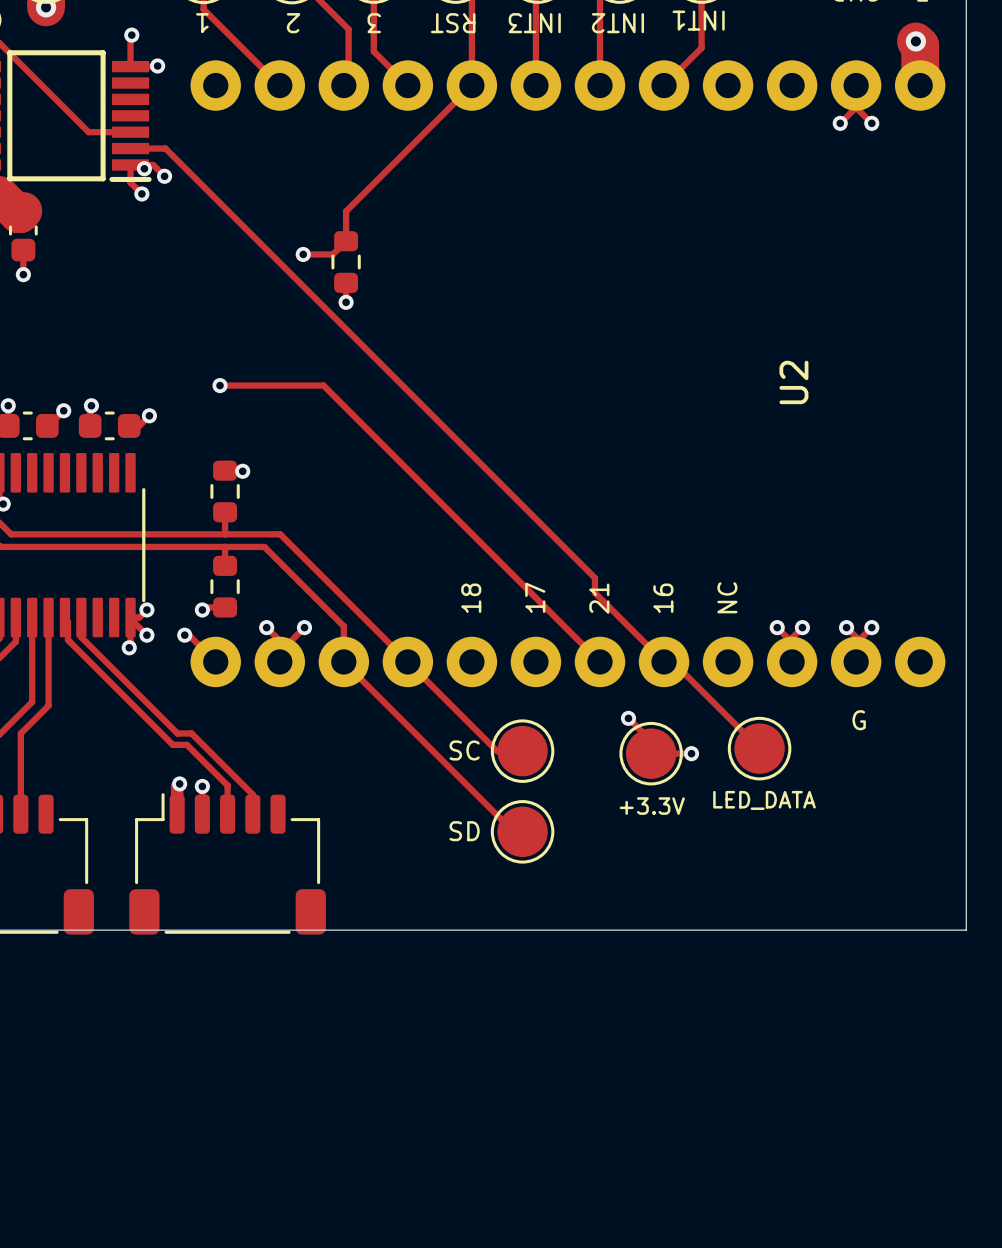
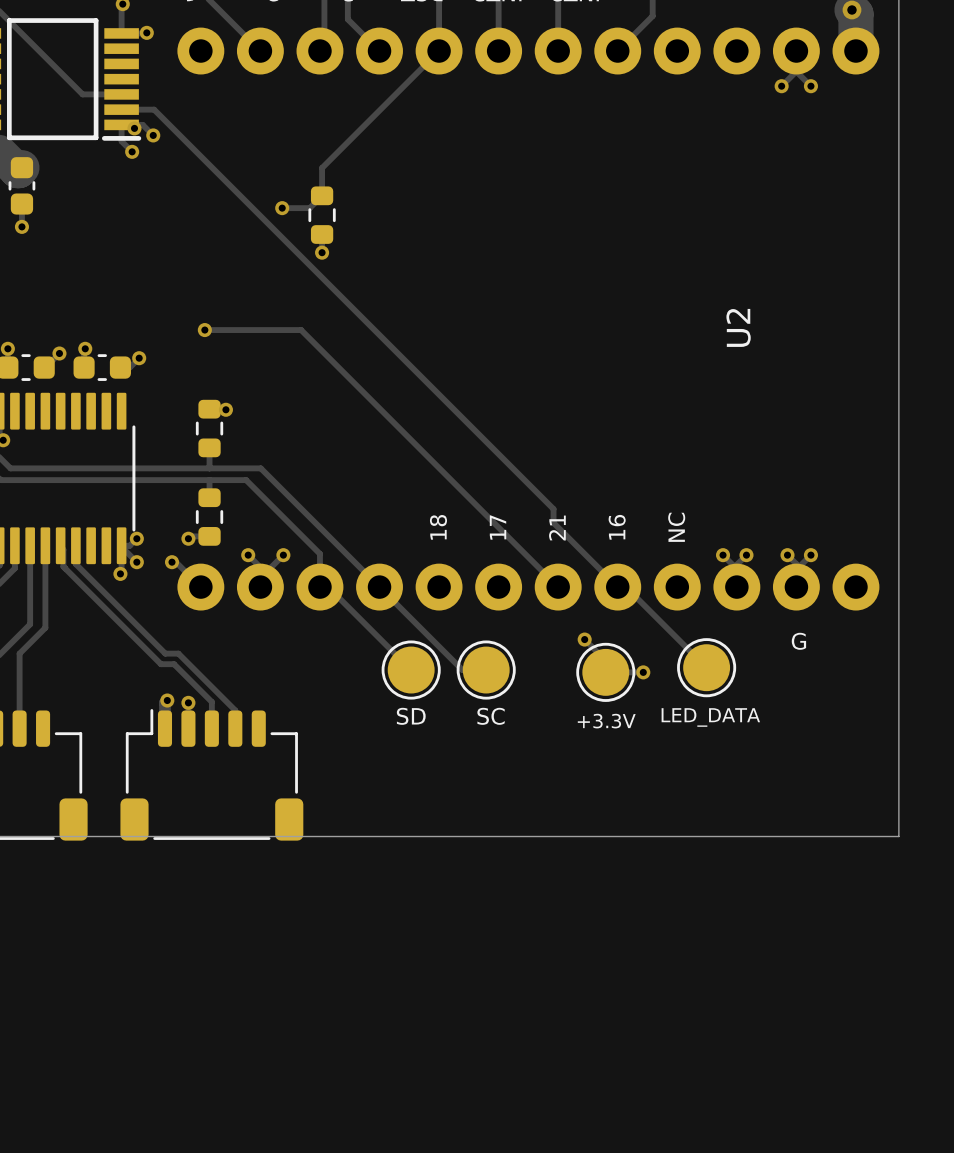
track: (343, 661) (513, 831) (522, 831) -> none
track: none -> (328, 587) (411, 670)
U2 text position: SC (464, 750) -> SC (491, 716)
U2 text position: SD (464, 831) -> SD (411, 716)
part position: (522, 831) -> (411, 670)

